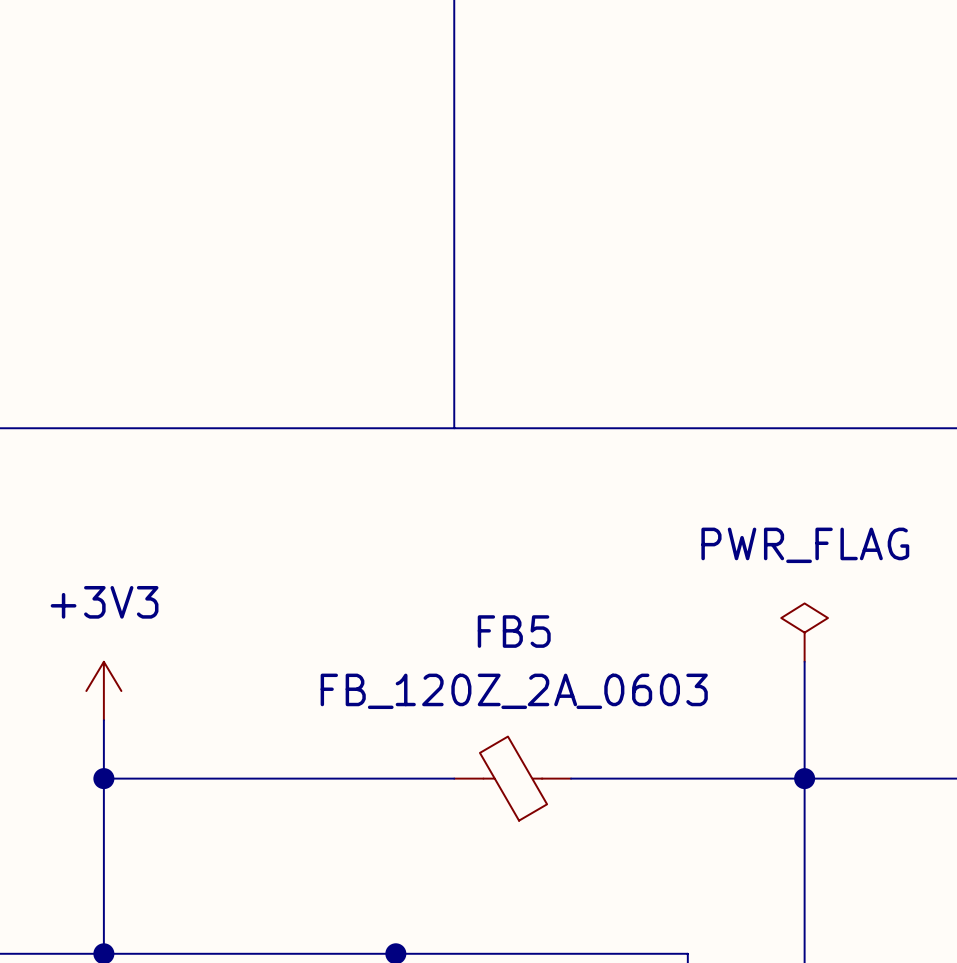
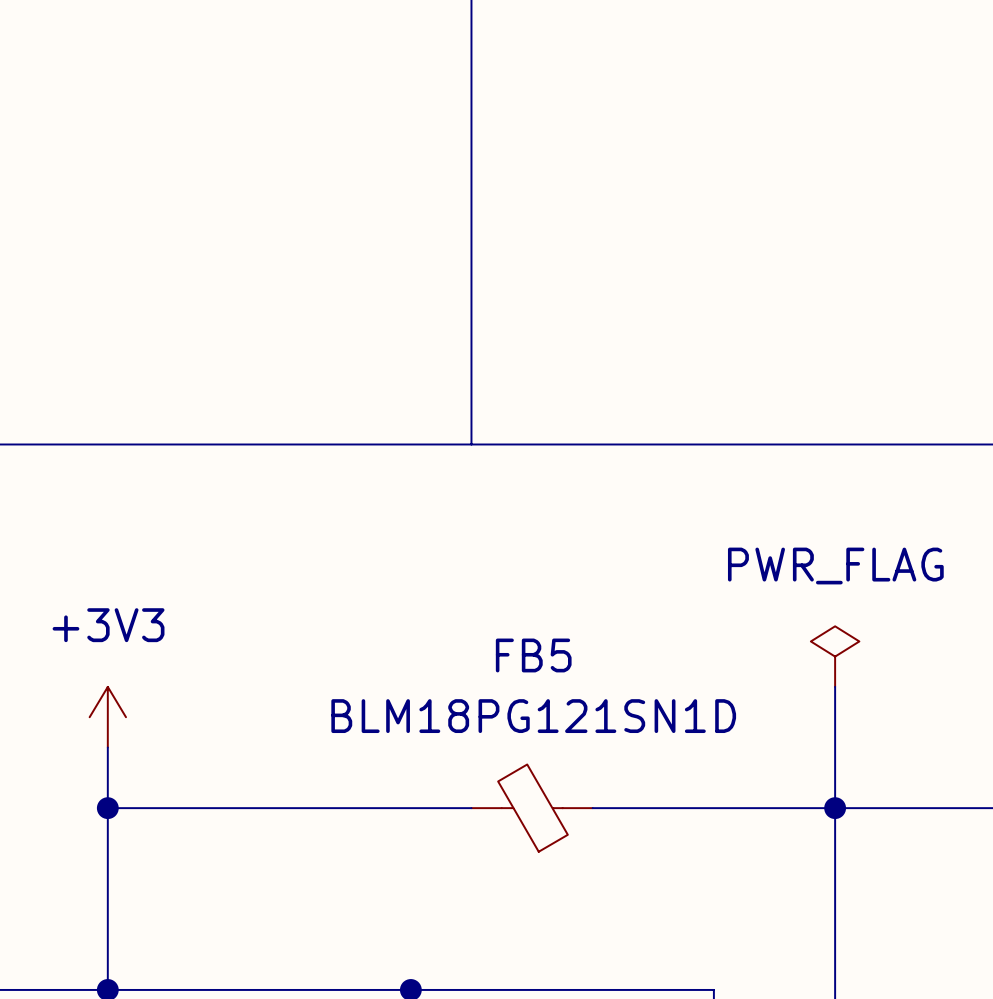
FB5 text: none -> BLM18PG121SN1D (533, 716)
FB5 value: FB_120Z_2A_0603 (514, 691) -> none

